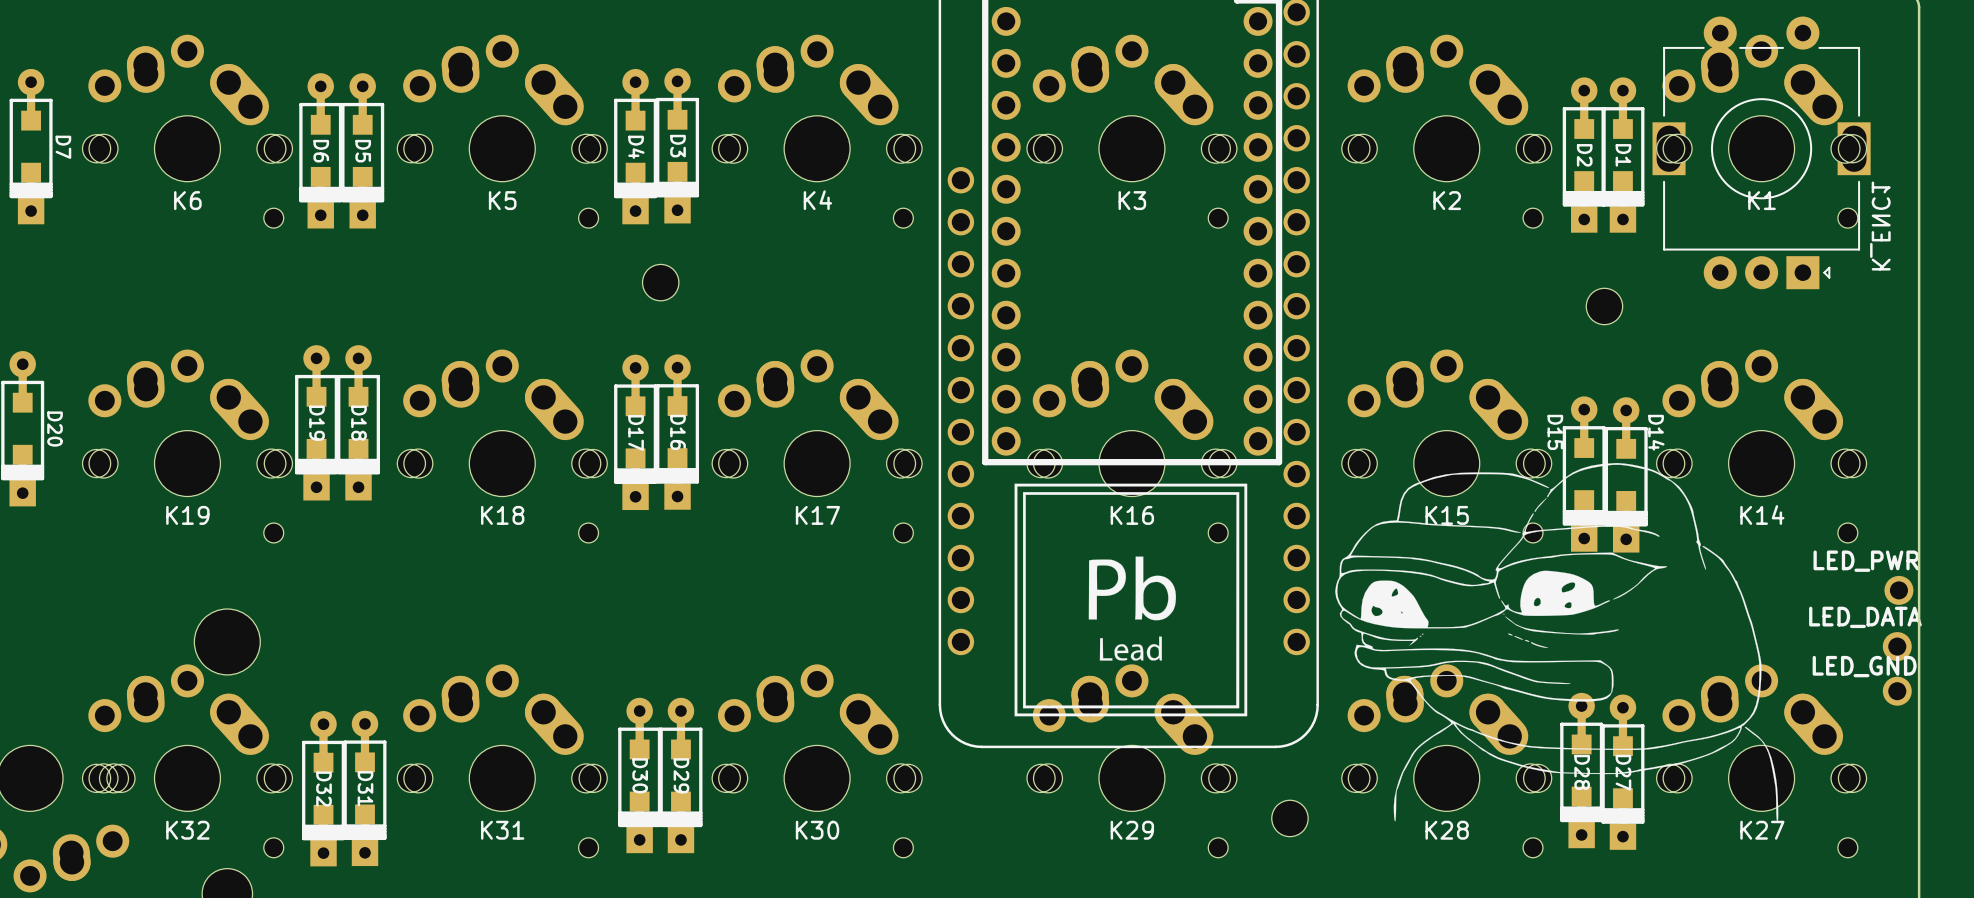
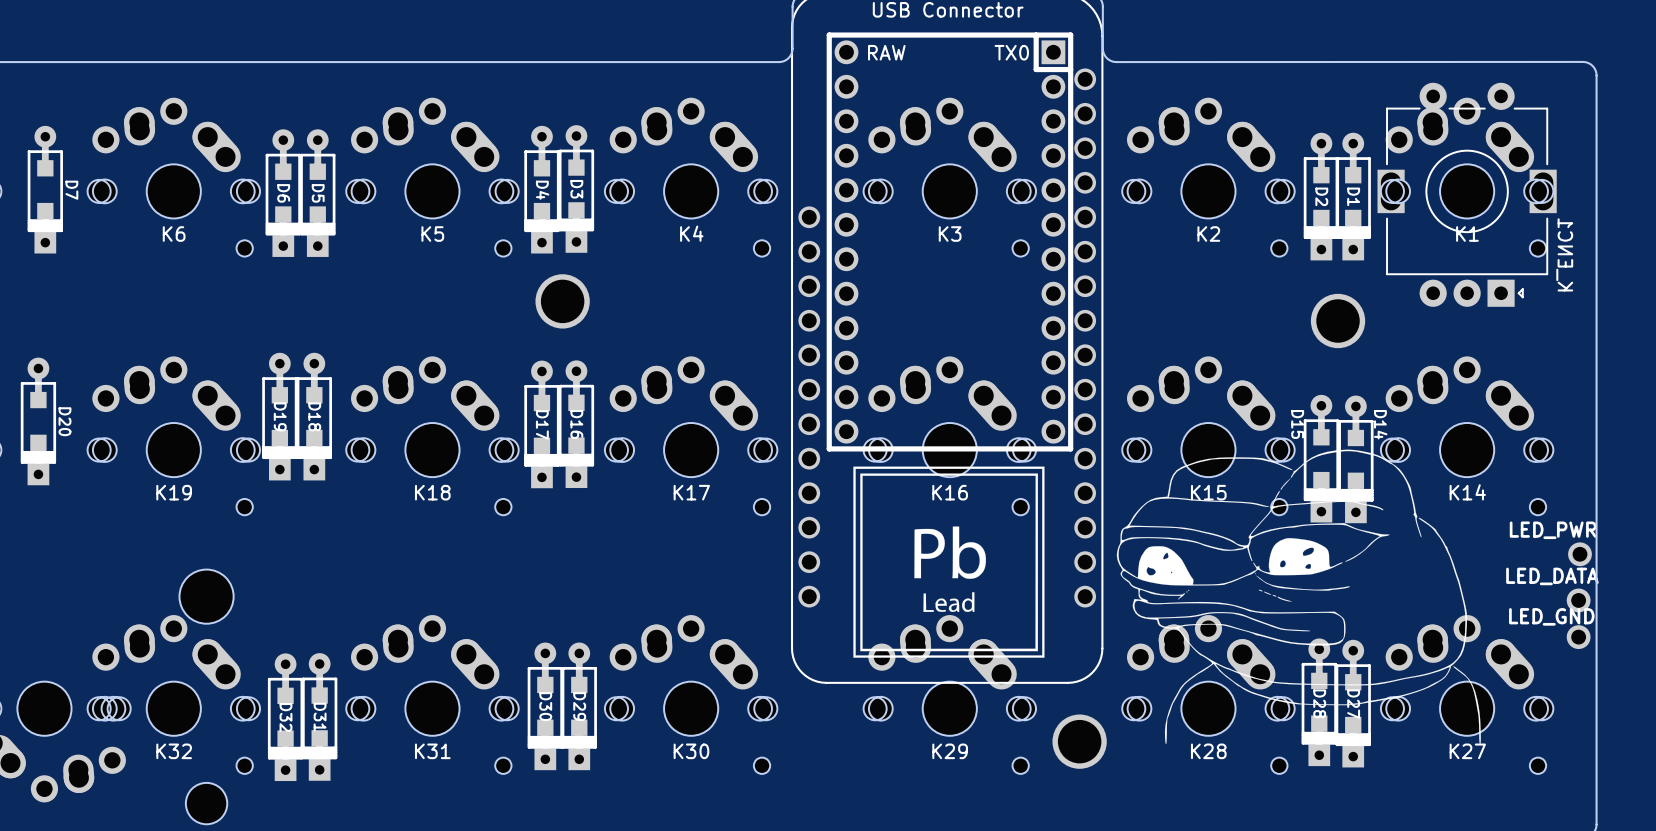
part footprint: [642, 264, 679, 301] -> [535, 274, 590, 329]
part footprint: [1586, 288, 1623, 325] -> [1310, 293, 1366, 349]
part footprint: [1271, 800, 1309, 837] -> [1052, 714, 1107, 769]

